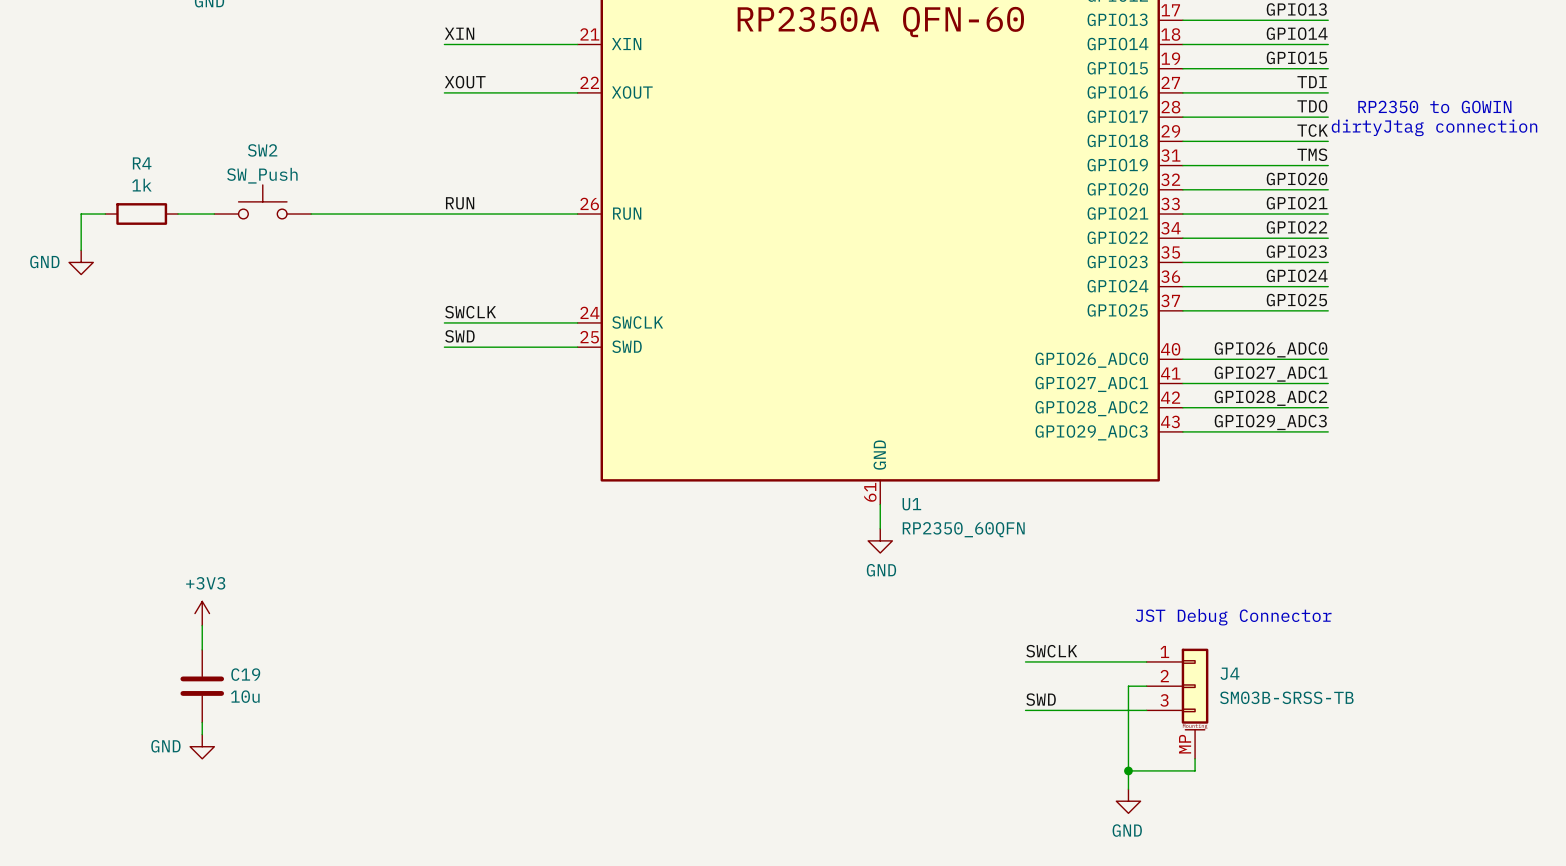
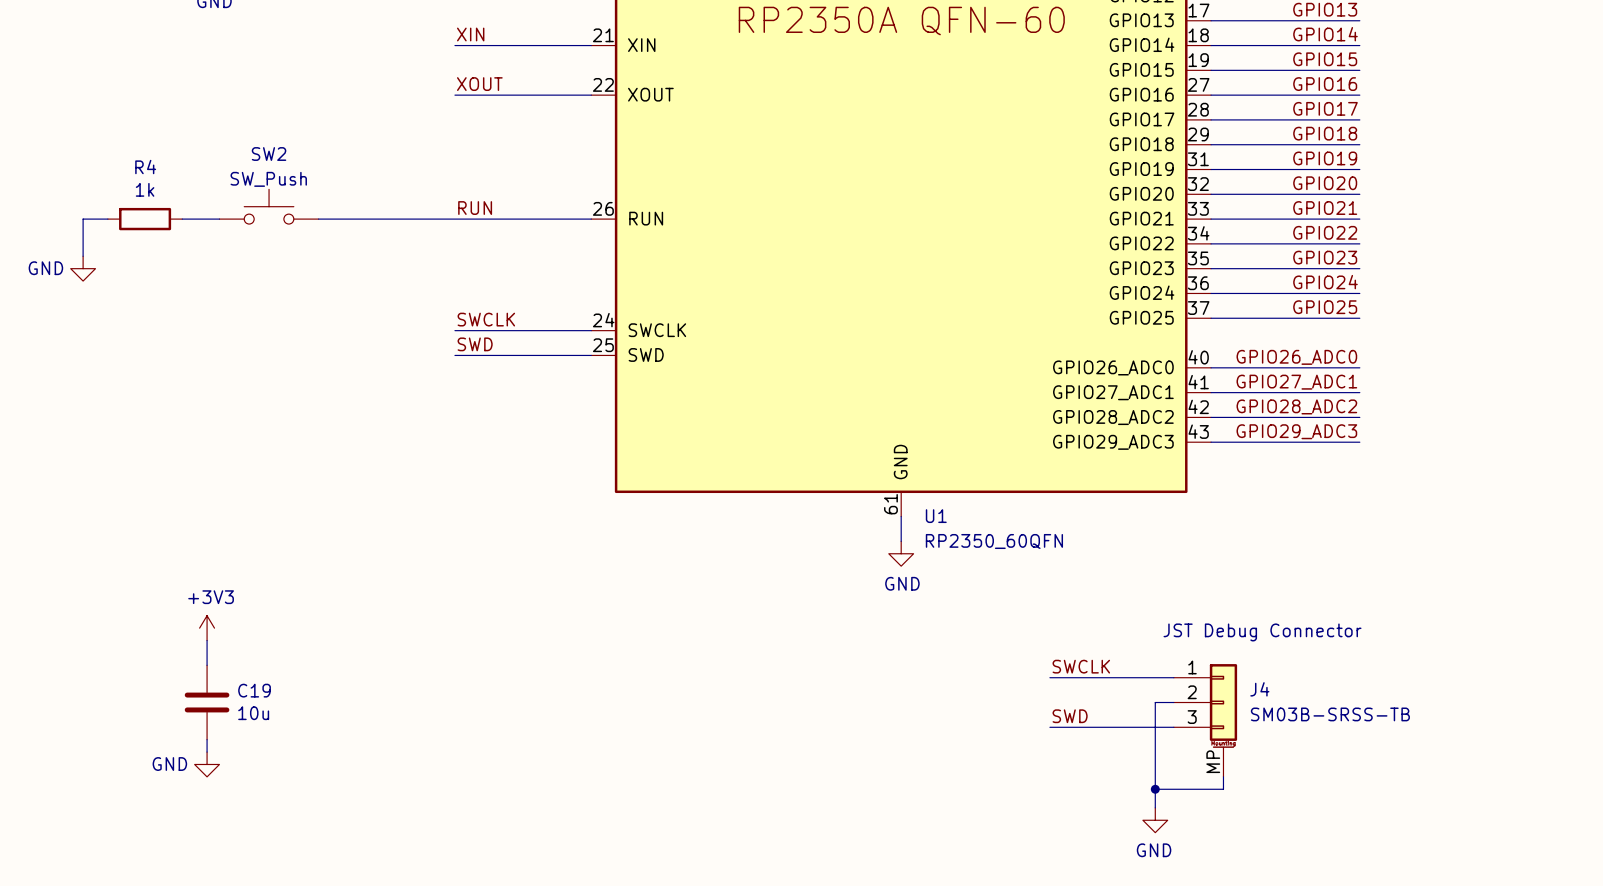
label: TDI (1312, 82) -> GPIO16 (1325, 84)
label: TDO (1312, 106) -> GPIO17 (1325, 108)
text: RP2350 to GOWIN (1434, 106) -> none
text: dirtyJtag connection (1434, 127) -> none
label: TCK (1312, 130) -> GPIO18 (1325, 133)
label: TMS (1312, 154) -> GPIO19 (1325, 158)

